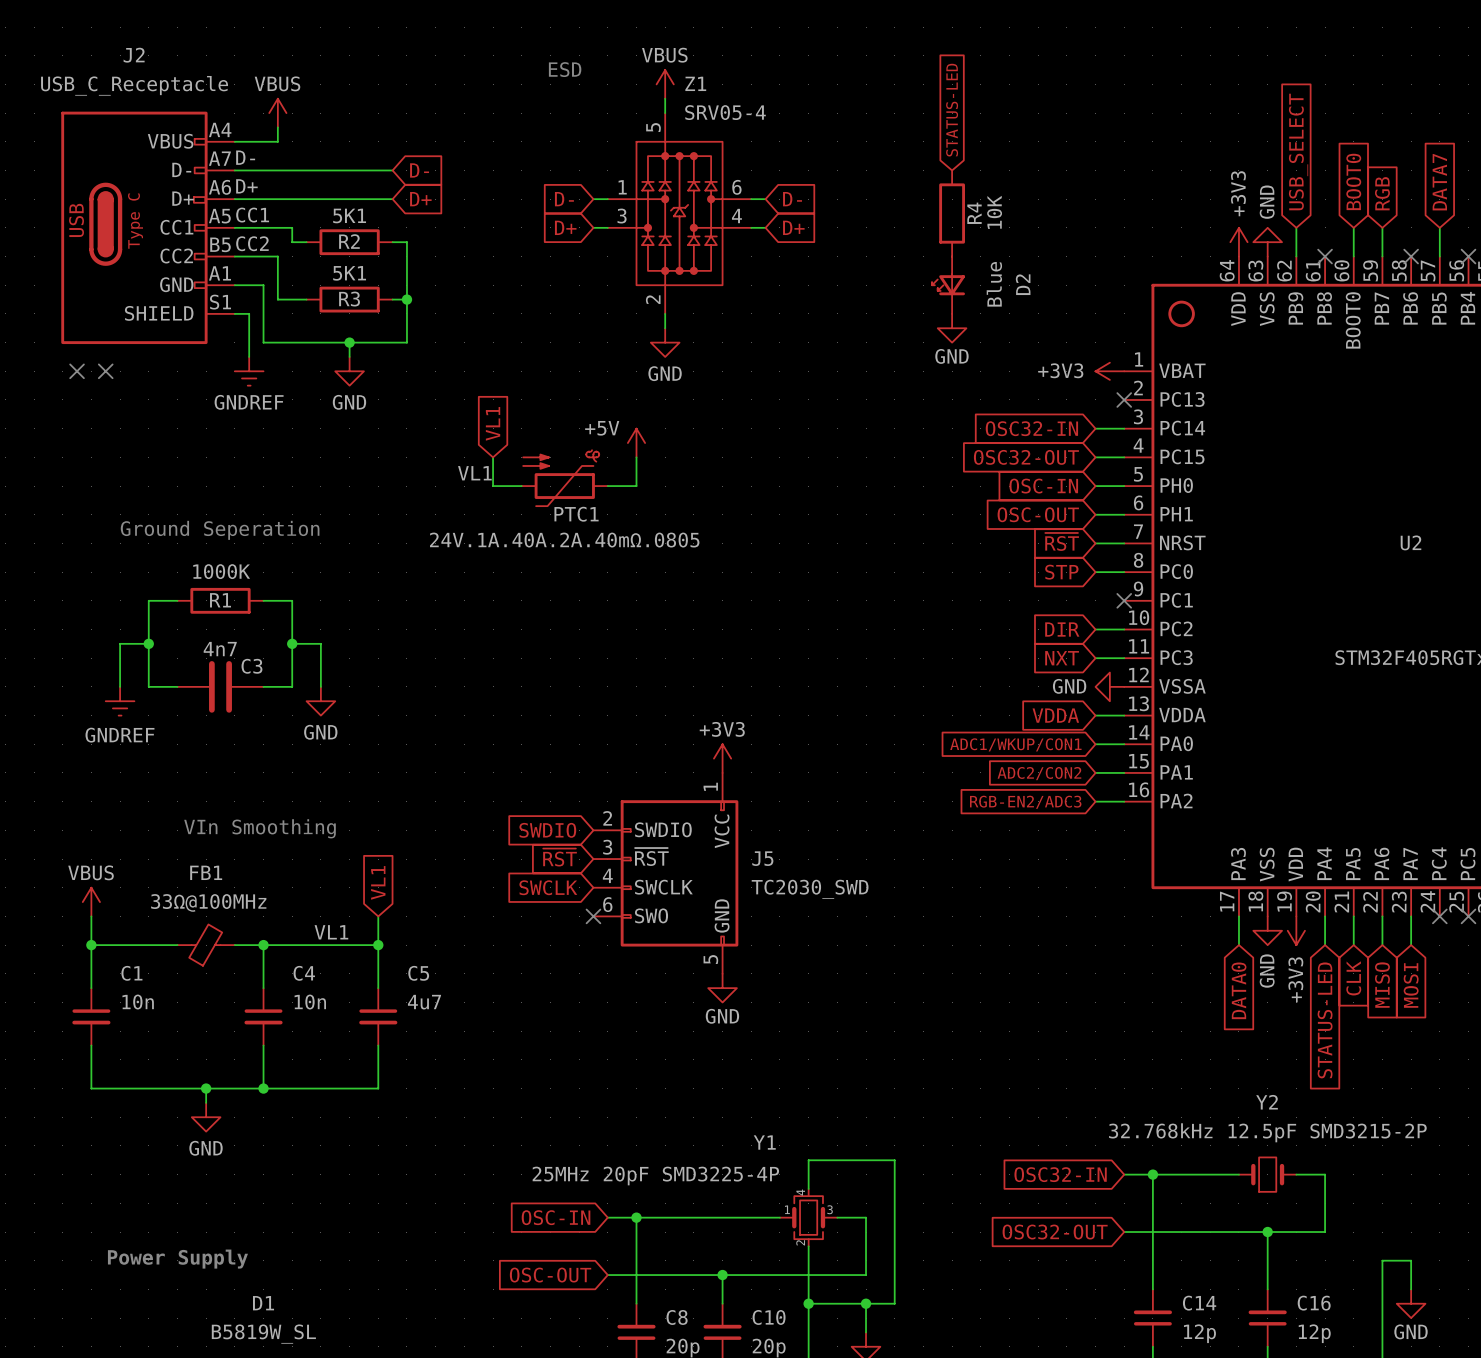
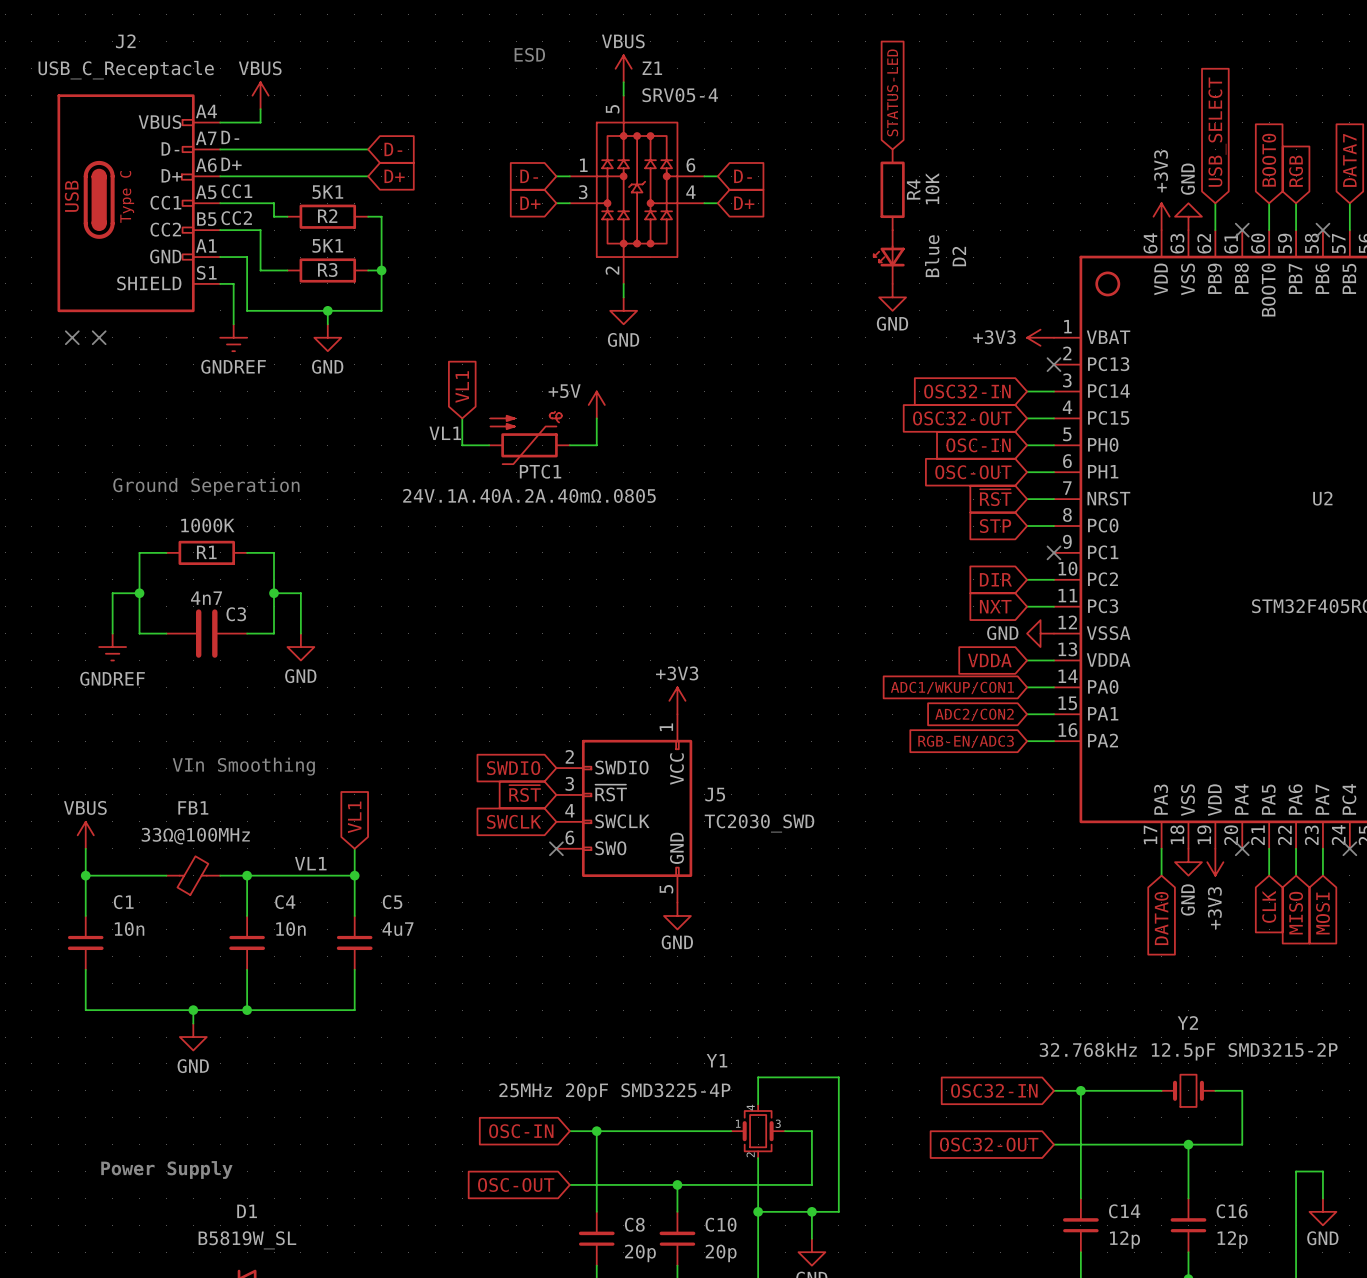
global label: RGB-EN2/ADC3 (1025, 802) -> RGB-EN/ADC3 (966, 741)
wire: (1325, 916) (1325, 945) -> none
no-connect mark: none -> (1242, 848)
global label: STATUS-LED (1325, 1020) -> none

